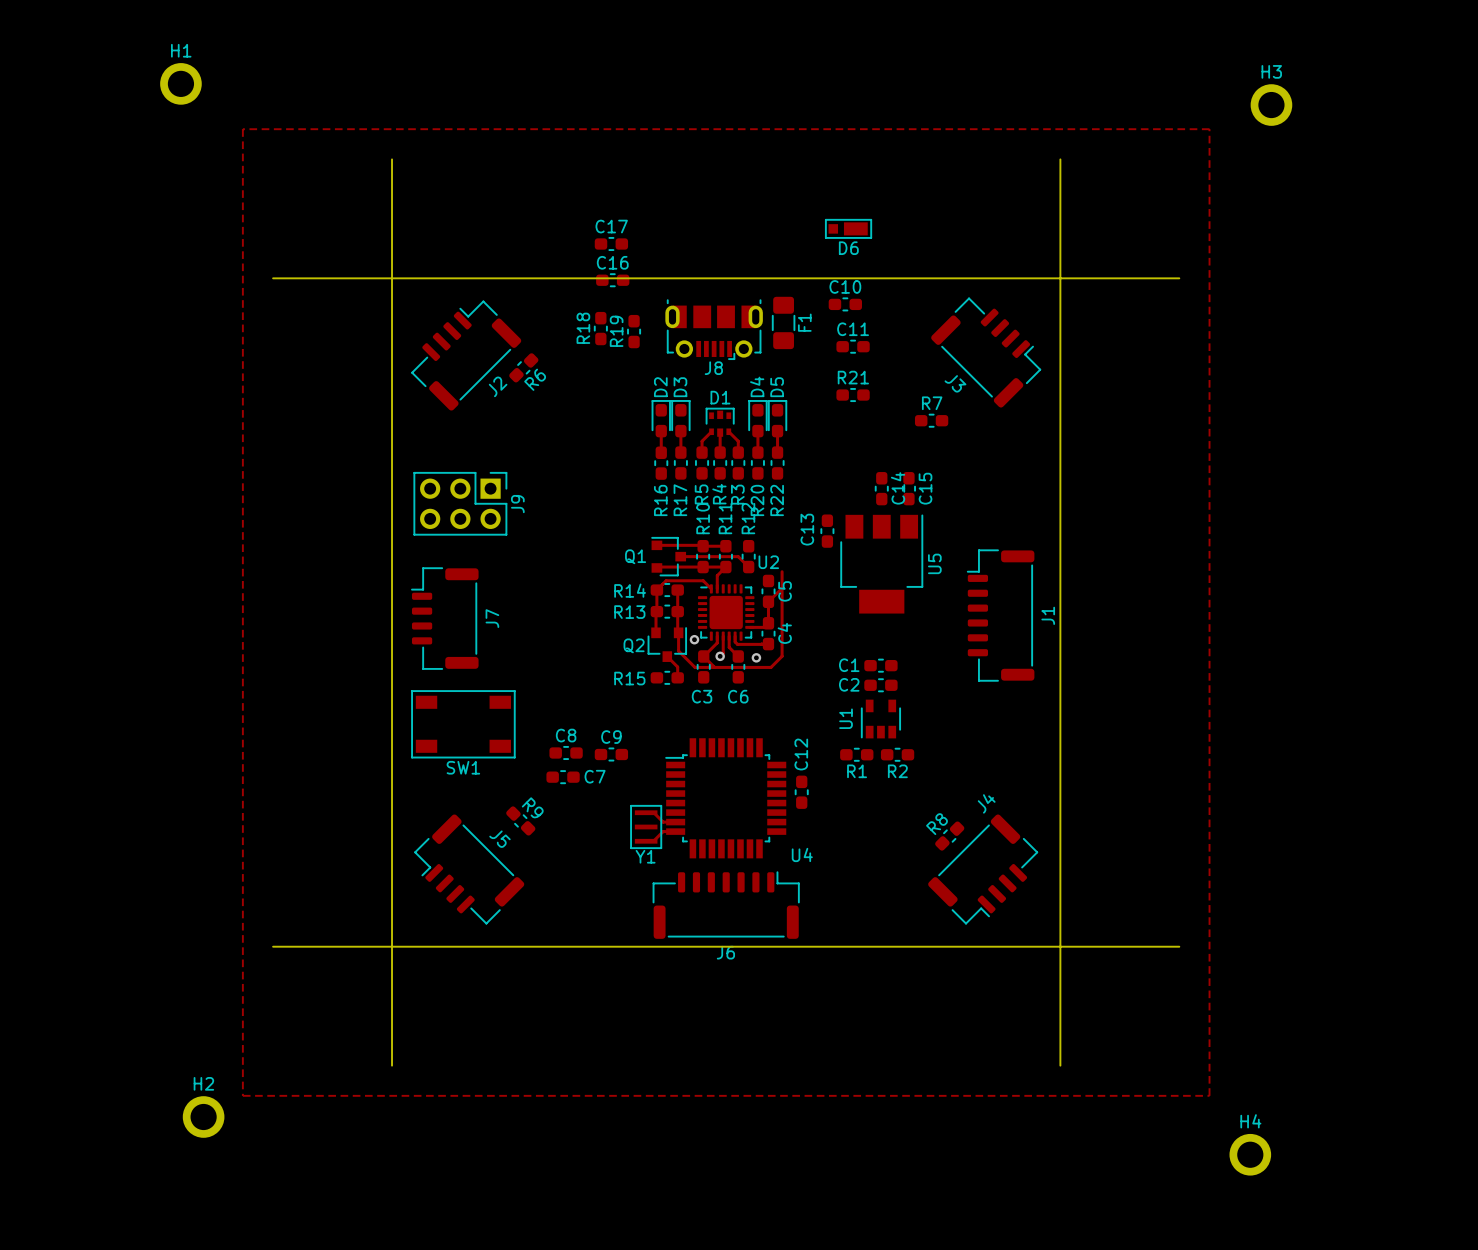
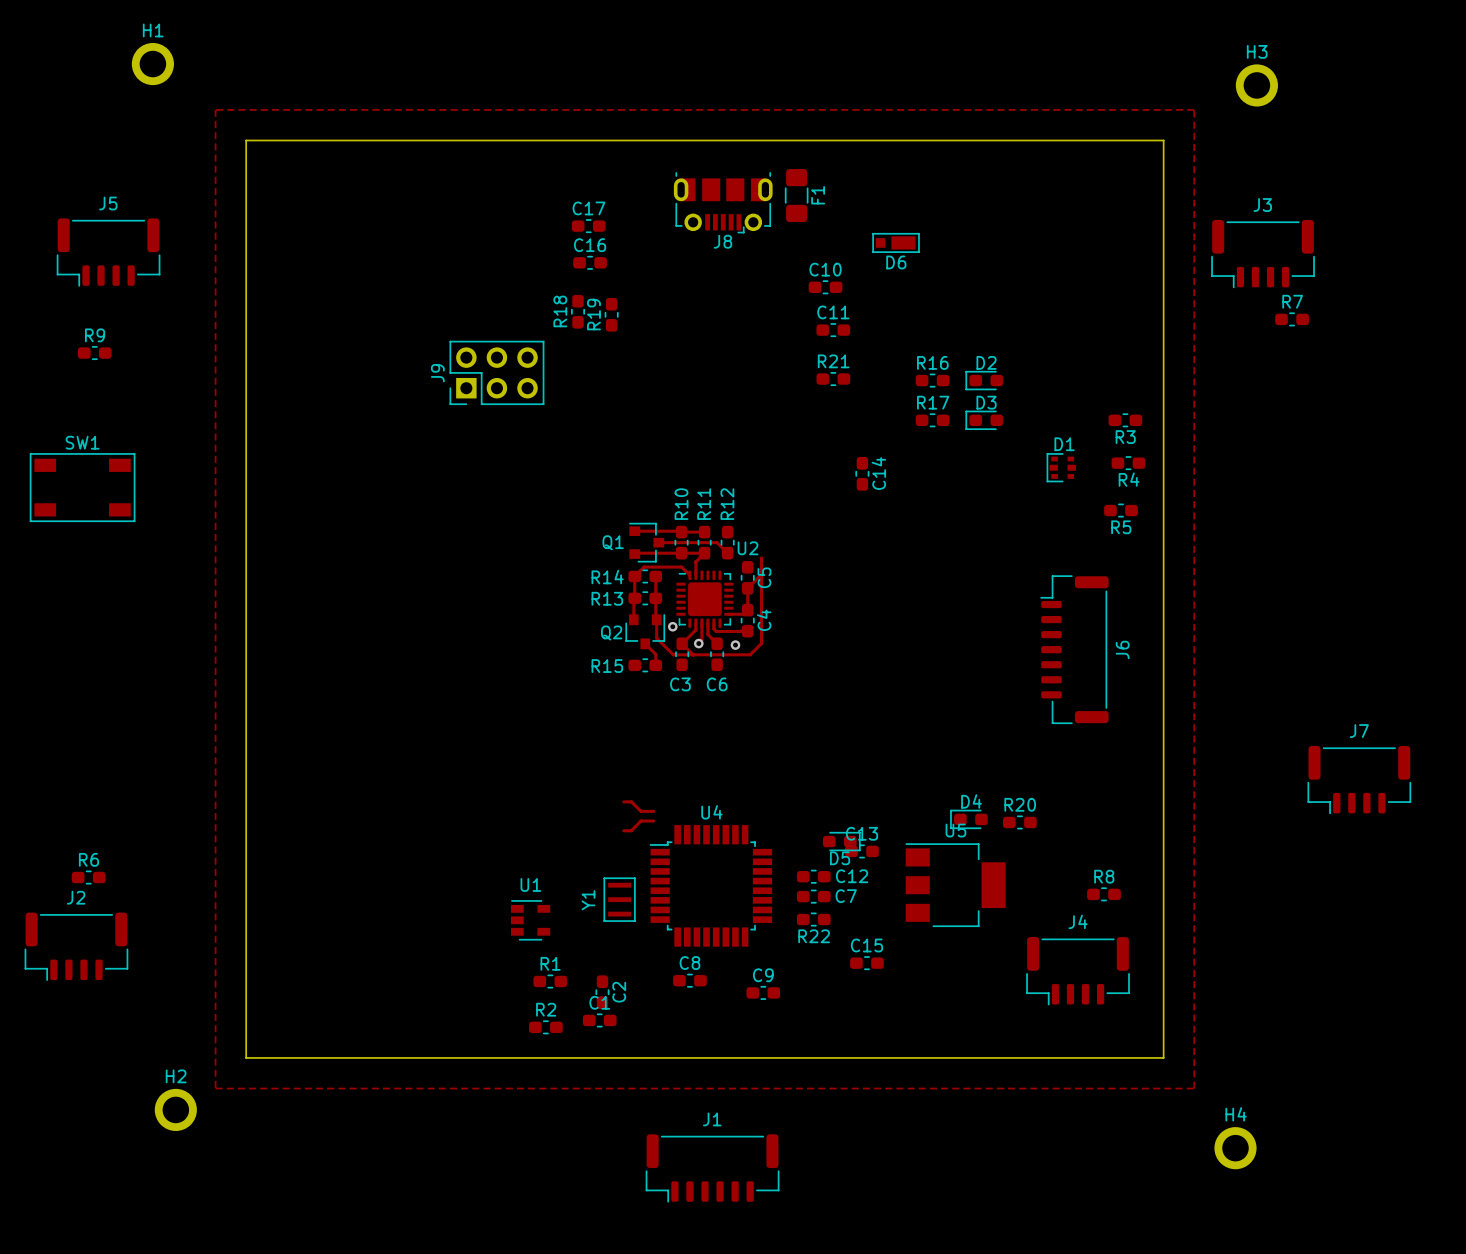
board edge: none -> (246, 140) (1163, 140) (1163, 1057) (246, 1057) (246, 140)
board edge: (392, 159) (392, 1065) -> none
board edge: (1060, 159) (1060, 1065) -> none
D6 position: (848, 228) -> (896, 242)
board edge: (273, 278) (1179, 278) -> none
F1 position: (783, 322) -> (796, 195)
J8 position: (714, 329) -> (723, 202)
J3 rotation: 0° (986, 352) -> 135° clockwise (1263, 254)
J3 position: (986, 352) -> (1263, 254)
J2 rotation: 0° (466, 355) -> 135° counterclockwise (76, 946)
J2 position: (466, 355) -> (76, 946)
R6 rotation: 0° (523, 367) -> 45° clockwise (88, 877)
R6 position: (523, 367) -> (88, 877)
R6 name position: R6 (535, 379) -> R6 (88, 859)
D5 name position: D5 (777, 387) -> D5 (840, 858)
D2 rotation: 0° (661, 418) -> 90° counterclockwise (984, 380)
D2 position: (661, 418) -> (984, 380)
D3 rotation: 0° (680, 418) -> 90° counterclockwise (984, 420)
D3 position: (680, 418) -> (984, 420)
D4 rotation: 0° (757, 418) -> 90° counterclockwise (969, 819)
D4 position: (757, 418) -> (969, 819)
D5 rotation: 0° (777, 418) -> 90° clockwise (841, 841)
D5 position: (777, 418) -> (841, 841)
R7 position: (931, 420) -> (1292, 319)
D1 rotation: 0° (720, 422) -> 90° counterclockwise (1061, 467)
D1 position: (720, 422) -> (1061, 467)
track: (661, 431) (661, 452) -> none
track: (680, 431) (680, 452) -> none
track: (711, 431) (702, 441) (702, 452) -> none
track: (728, 431) (738, 441) (738, 452) -> none
track: (757, 431) (757, 452) -> none
track: (777, 431) (777, 452) -> none
track: (720, 432) (720, 452) -> none
R17 rotation: 0° (680, 462) -> 90° clockwise (932, 420)
R17 position: (680, 462) -> (932, 420)
R5 rotation: 0° (702, 462) -> 90° clockwise (1120, 510)
R5 position: (702, 462) -> (1120, 510)
R4 rotation: 0° (720, 462) -> 90° clockwise (1128, 463)
R4 position: (720, 462) -> (1128, 463)
R3 rotation: 0° (738, 462) -> 90° clockwise (1125, 420)
R3 position: (738, 462) -> (1125, 420)
R20 rotation: 0° (757, 462) -> 90° clockwise (1019, 822)
R20 position: (757, 462) -> (1019, 822)
R22 rotation: 0° (777, 462) -> 90° clockwise (813, 919)
R22 position: (777, 462) -> (813, 919)
R16 rotation: 0° (661, 463) -> 90° clockwise (932, 380)
R16 position: (661, 463) -> (932, 380)
C15 rotation: 0° (908, 488) -> 90° clockwise (866, 963)
C15 position: (908, 488) -> (866, 963)
C15 name position: C15 (925, 488) -> C15 (866, 945)
R16 name position: R16 (660, 500) -> R16 (932, 362)
R17 name position: R17 (680, 500) -> R17 (933, 402)
R20 name position: R20 (757, 500) -> R20 (1020, 804)
J9 rotation: 0° (460, 503) -> 180° (496, 372)
J9 position: (460, 503) -> (496, 372)
C13 rotation: 0° (827, 531) -> 90° clockwise (862, 851)
C13 position: (827, 531) -> (862, 851)
U5 rotation: 0° (881, 564) -> 90° counterclockwise (955, 885)
U5 position: (881, 564) -> (955, 885)
J1 rotation: 0° (1000, 615) -> 90° counterclockwise (712, 1168)
J1 position: (1000, 615) -> (712, 1168)
J7 rotation: 0° (444, 618) -> 90° counterclockwise (1359, 780)
J7 position: (444, 618) -> (1359, 780)
C1 name position: C1 (849, 665) -> C1 (599, 1002)
C1 position: (880, 665) -> (599, 1020)
C2 name position: C2 (849, 684) -> C2 (619, 992)
C2 rotation: 0° (880, 685) -> 90° clockwise (602, 992)
C2 position: (880, 685) -> (602, 992)
U1 rotation: 0° (880, 719) -> 90° clockwise (530, 920)
U1 position: (880, 719) -> (530, 920)
SW1 position: (463, 724) -> (82, 487)
C8 position: (566, 752) -> (689, 980)
C9 position: (611, 754) -> (763, 992)
R1 position: (856, 754) -> (550, 981)
R2 position: (897, 754) -> (545, 1027)
SW1 name position: SW1 (463, 767) -> SW1 (82, 442)
R1 name position: R1 (857, 771) -> R1 (550, 963)
R2 name position: R2 (897, 771) -> R2 (546, 1009)
C7 position: (563, 777) -> (813, 896)
C12 rotation: 0° (801, 792) -> 90° clockwise (813, 876)
C12 position: (801, 792) -> (813, 876)
U4 position: (725, 798) -> (710, 885)
R9 rotation: 0° (520, 820) -> 45° counterclockwise (94, 353)
R9 position: (520, 820) -> (94, 353)
Y1 position: (646, 827) -> (619, 899)
R8 rotation: 0° (949, 836) -> 45° clockwise (1103, 894)
R8 position: (949, 836) -> (1103, 894)
U4 name position: U4 (802, 854) -> U4 (711, 812)
Y1 name rotation: 0° (645, 856) -> 90° counterclockwise (588, 900)
Y1 name position: Y1 (645, 856) -> Y1 (588, 900)
J5 rotation: 0° (469, 869) -> 45° counterclockwise (108, 252)
J5 position: (469, 869) -> (108, 252)
J4 rotation: 0° (983, 869) -> 45° clockwise (1078, 971)
J4 position: (983, 869) -> (1078, 971)
J6 rotation: 0° (726, 905) -> 90° counterclockwise (1074, 649)
J6 position: (726, 905) -> (1074, 649)
board edge: (273, 946) (1179, 946) -> none

